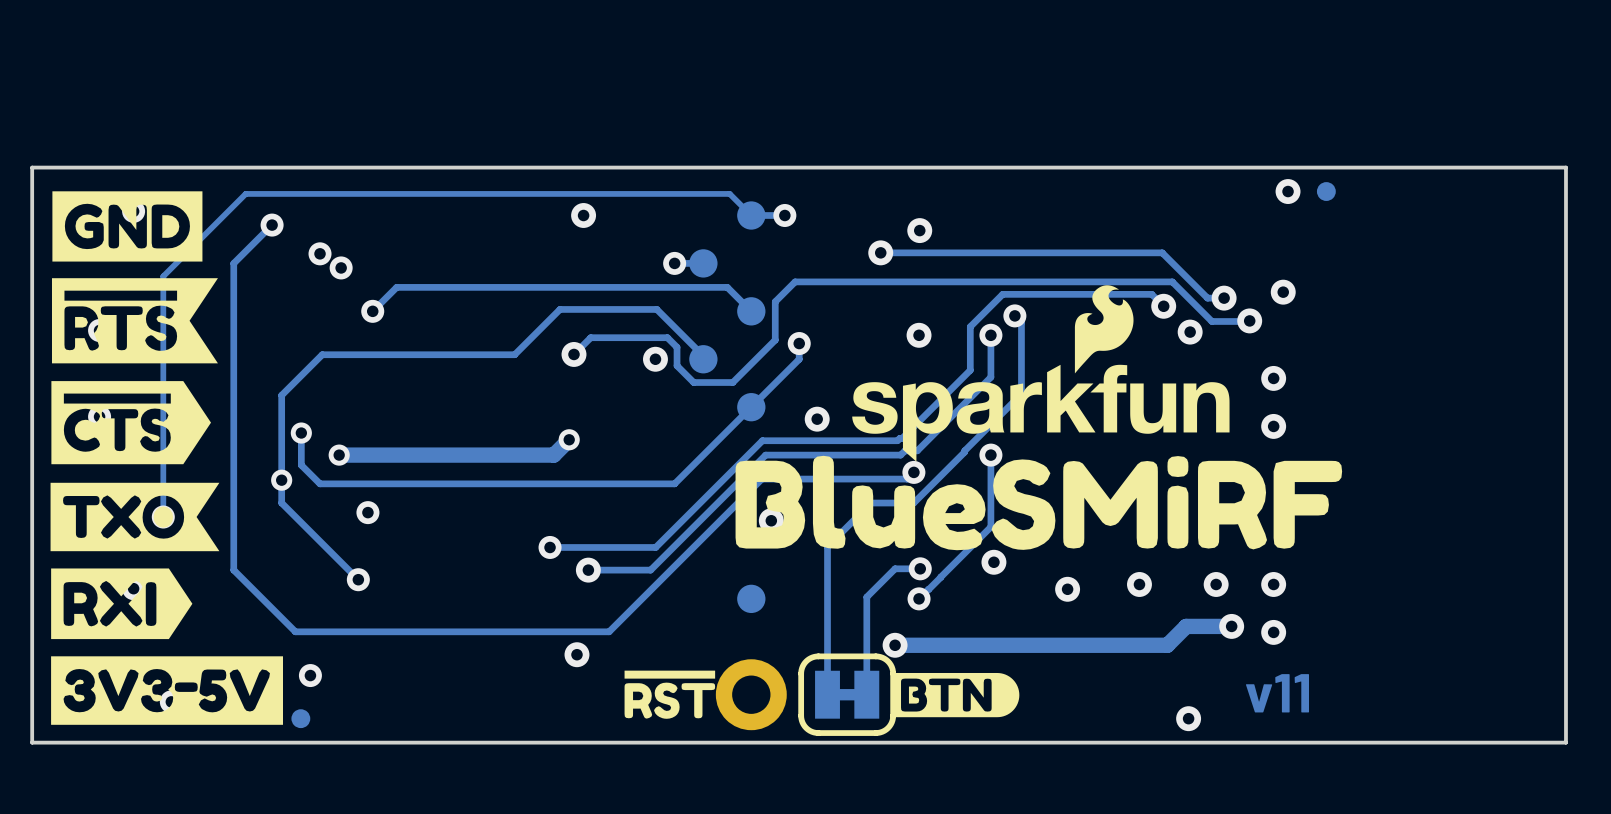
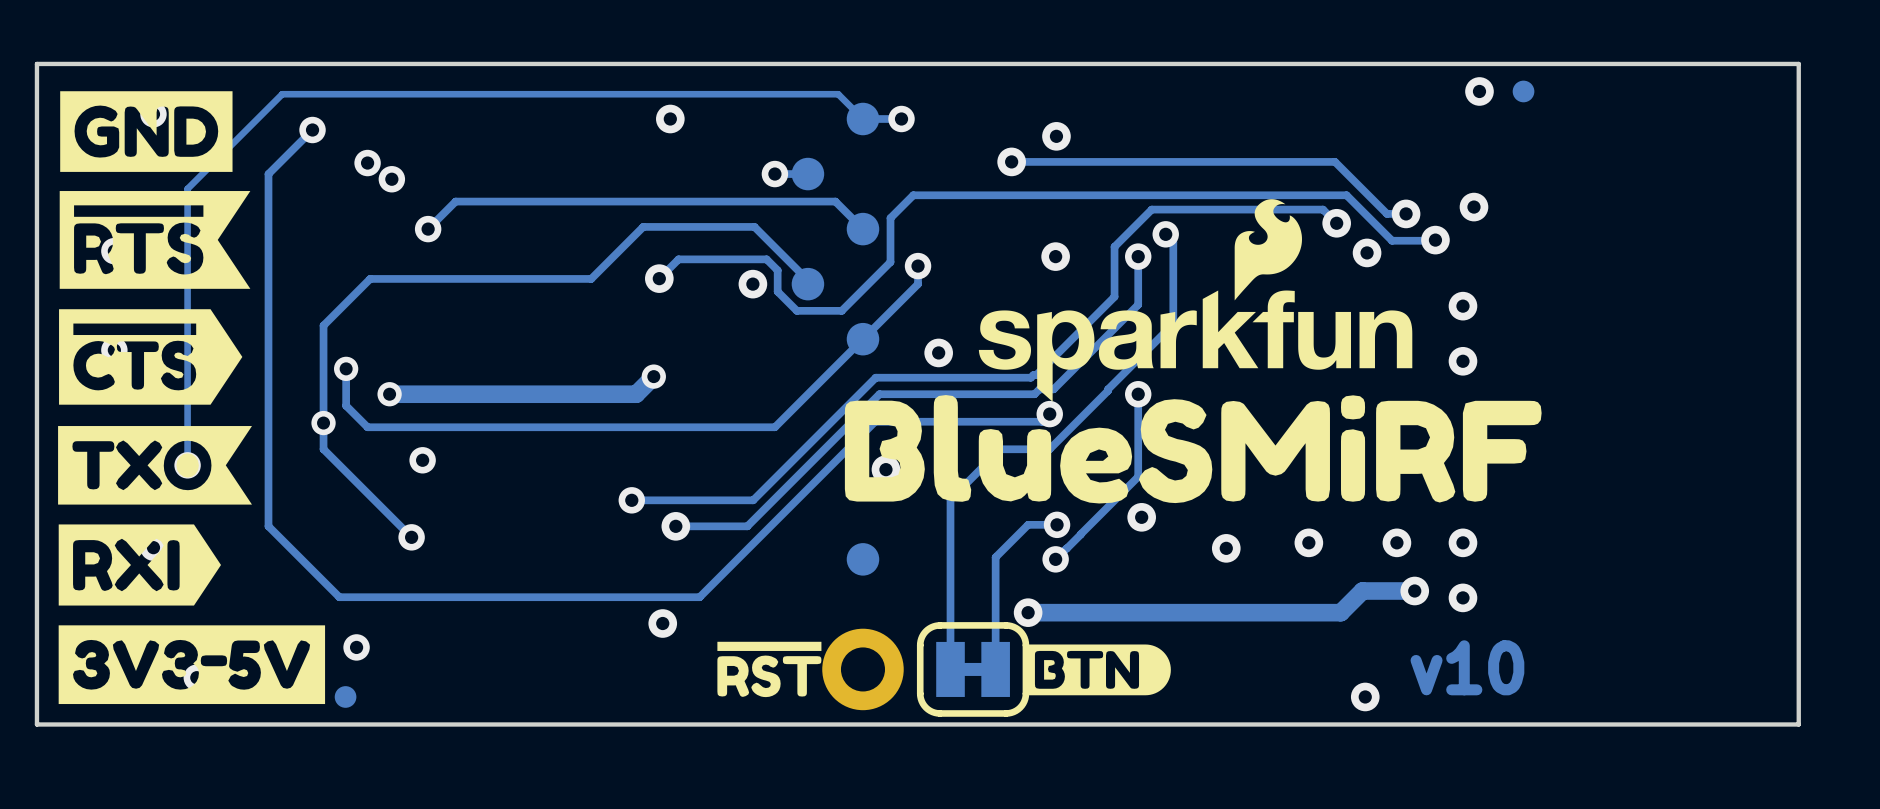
text: v11 (1277, 693) -> v10 (1467, 667)

